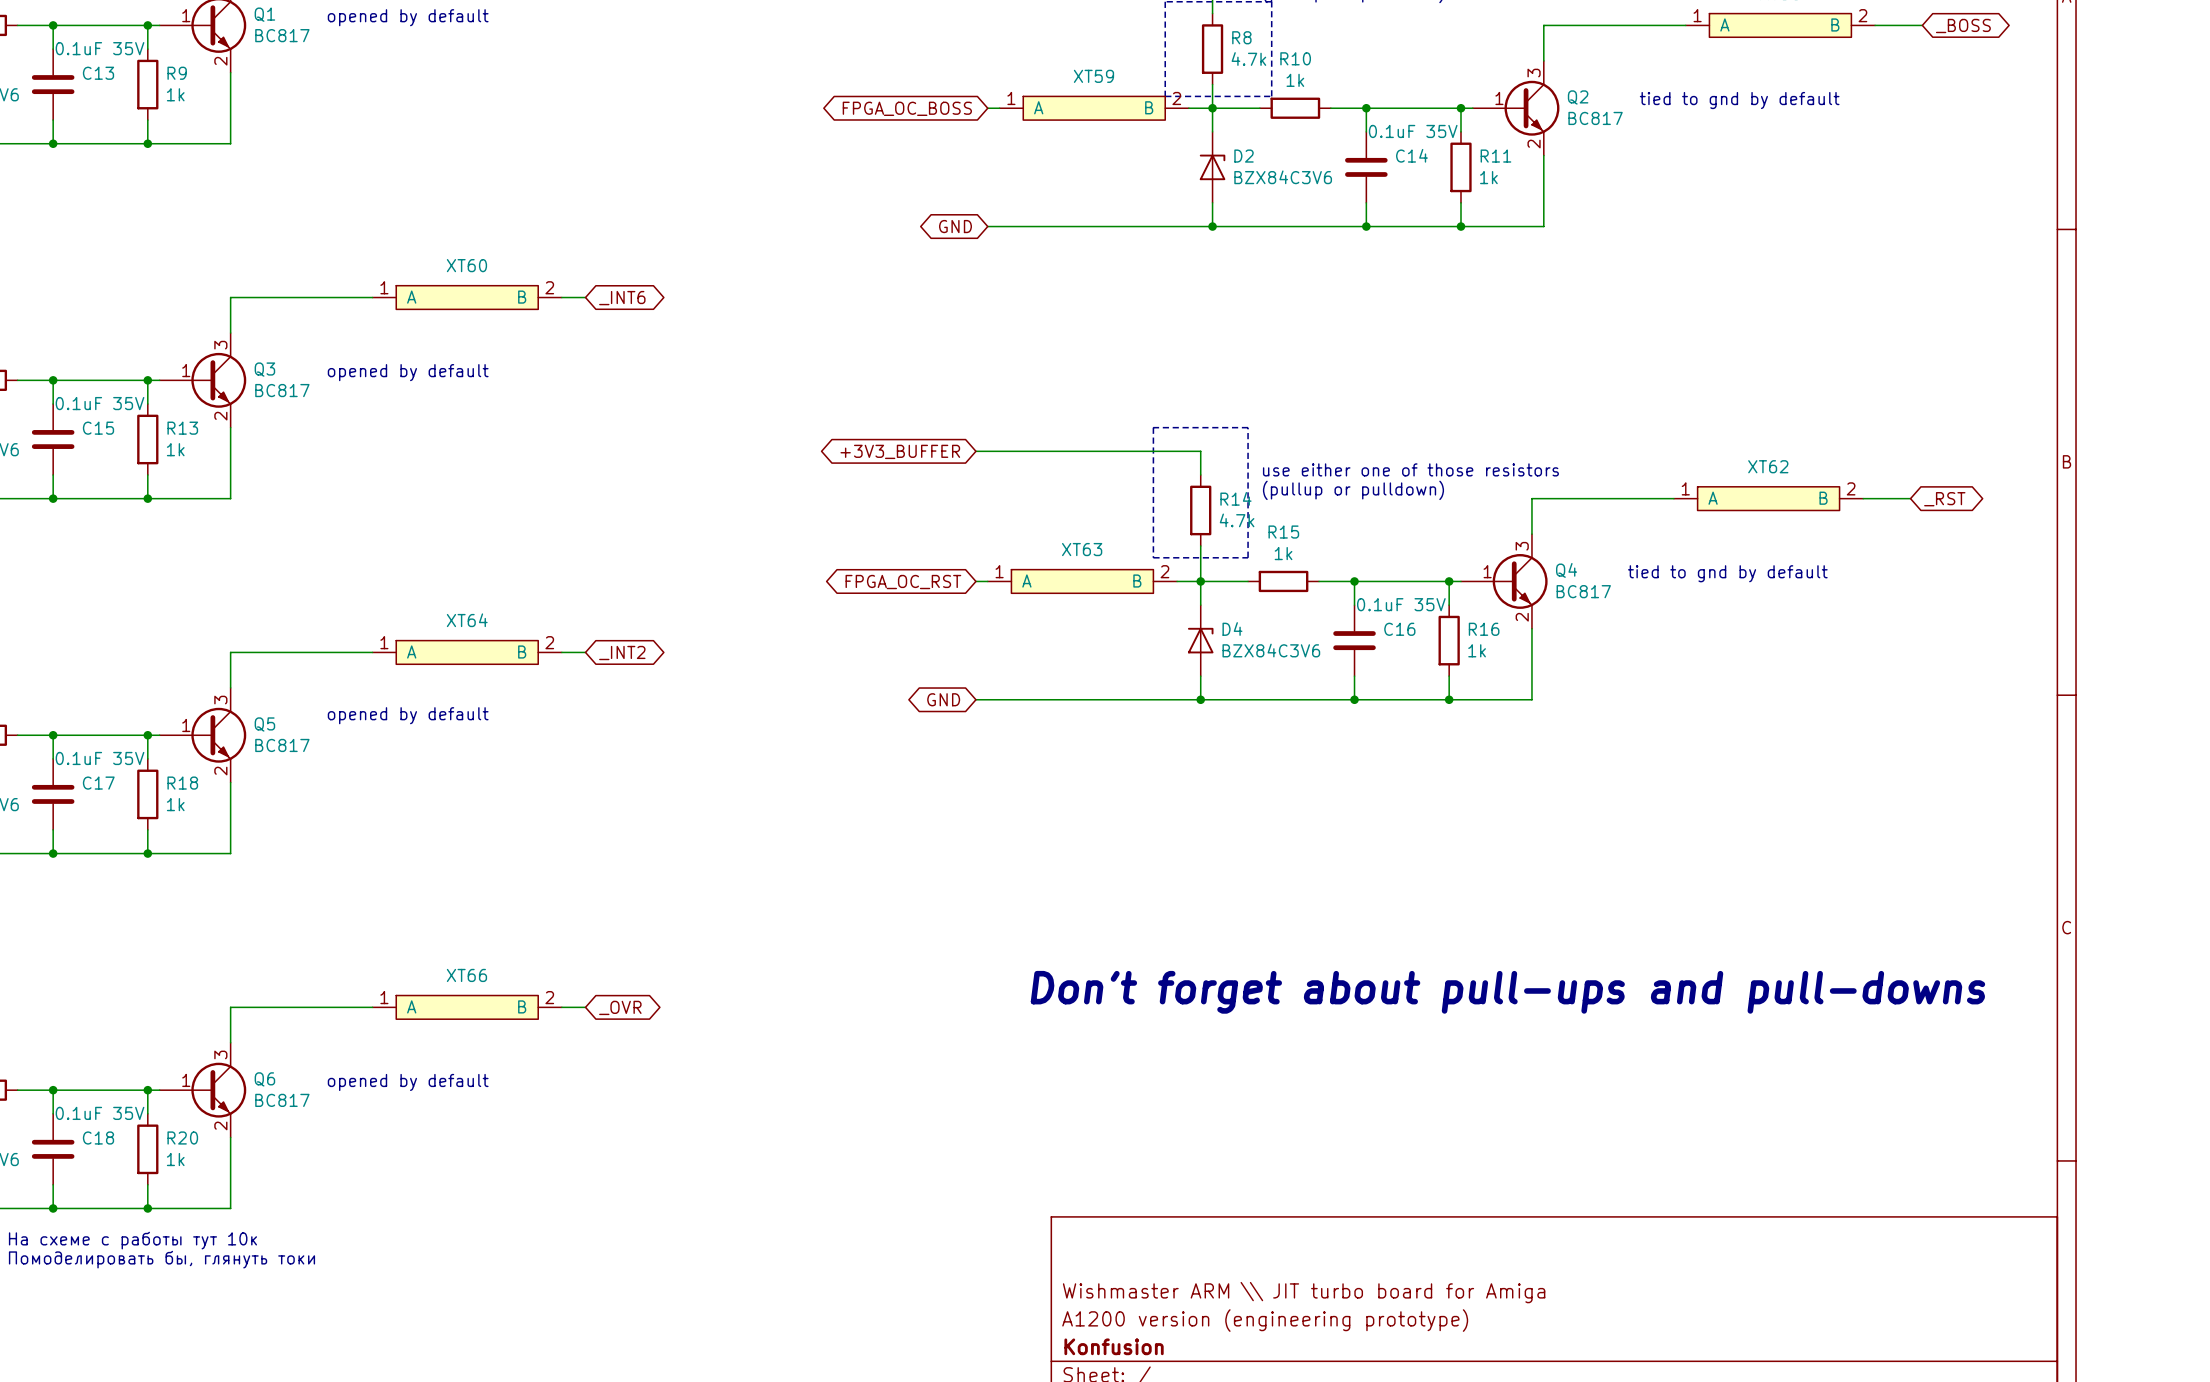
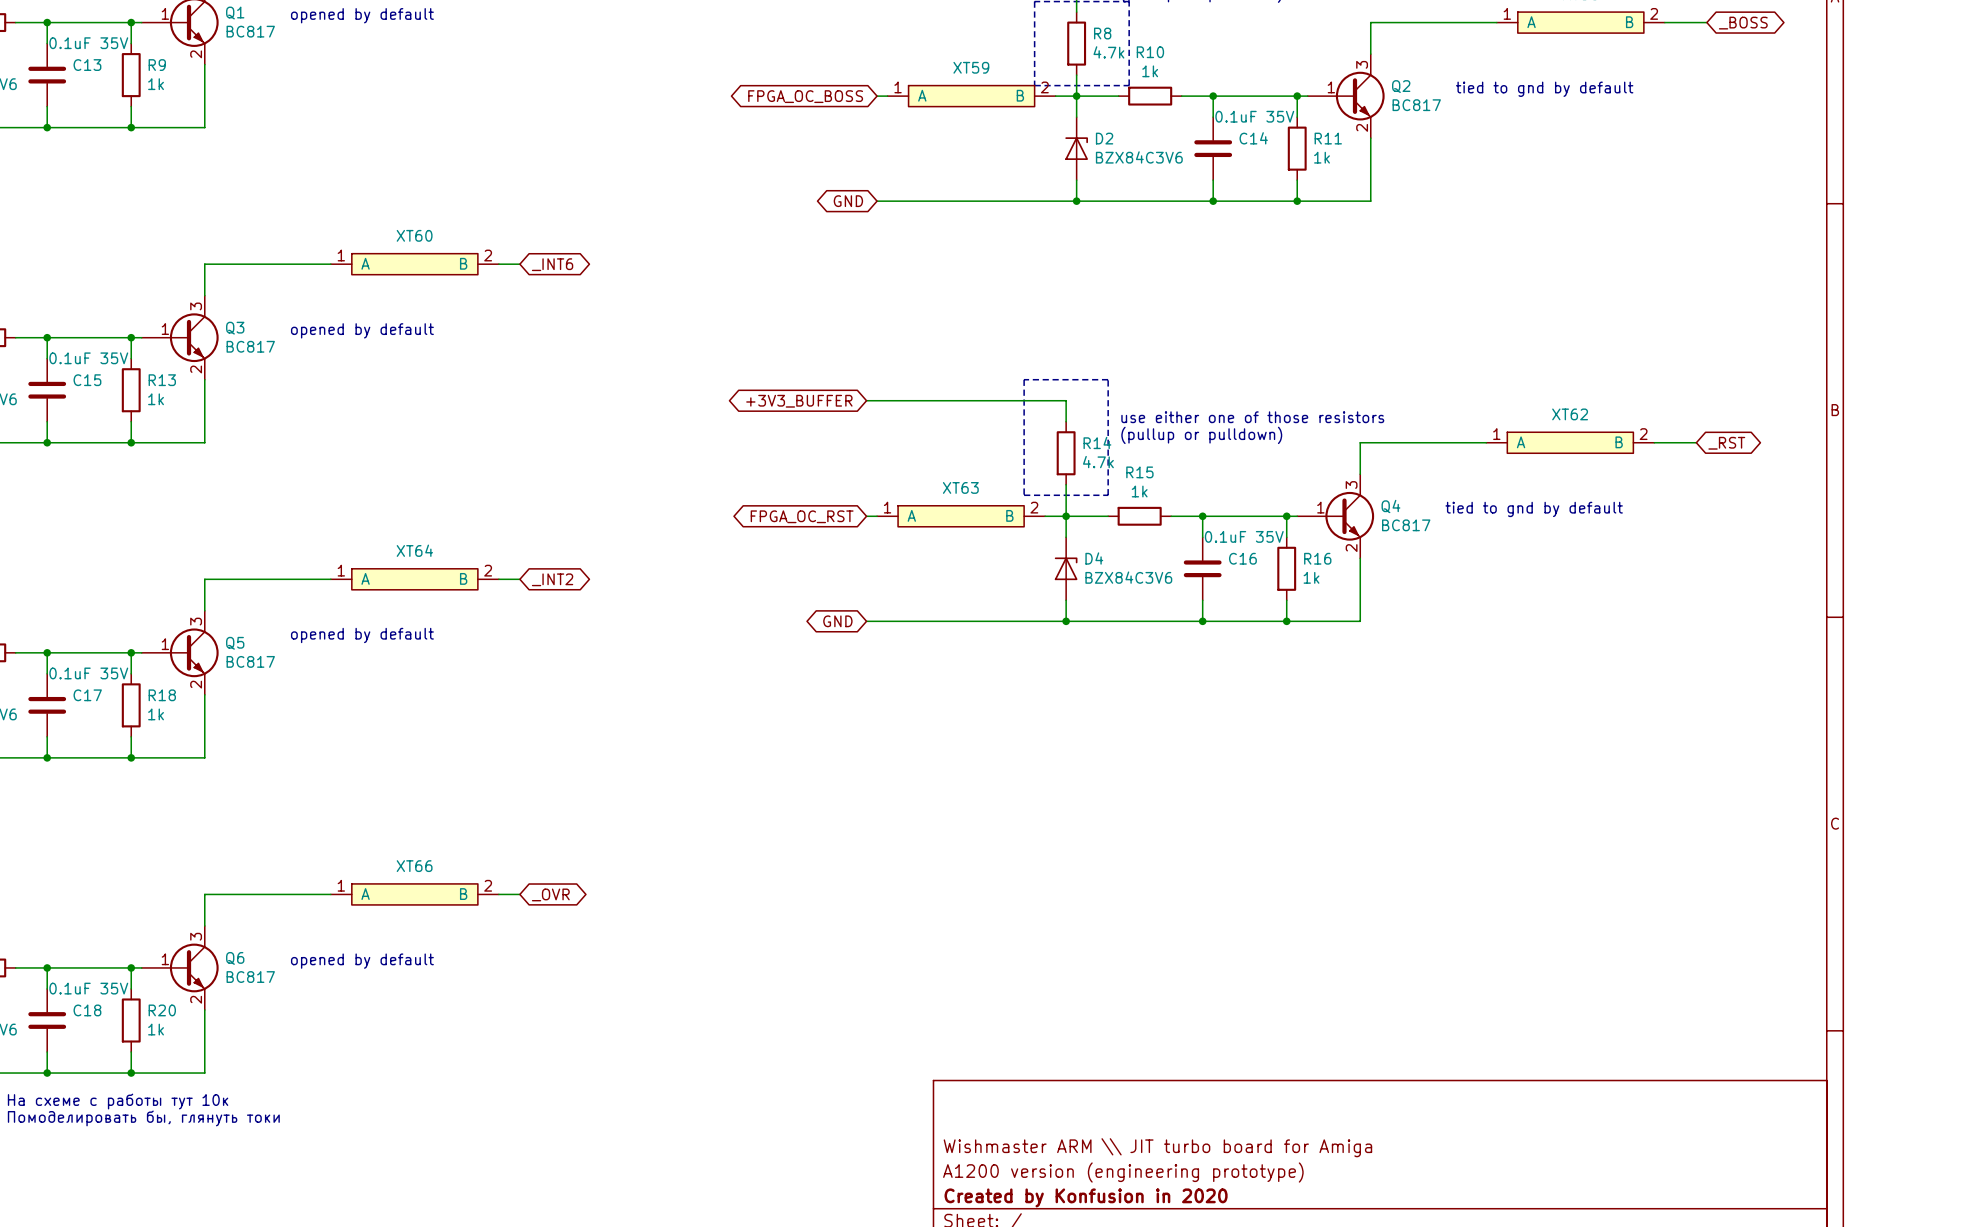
text: Don't forget about pull-ups and pull-downs (1507, 992) -> none
title block: Konfusion (1114, 1346) -> Created by Konfusion in 2020 (1086, 1197)

